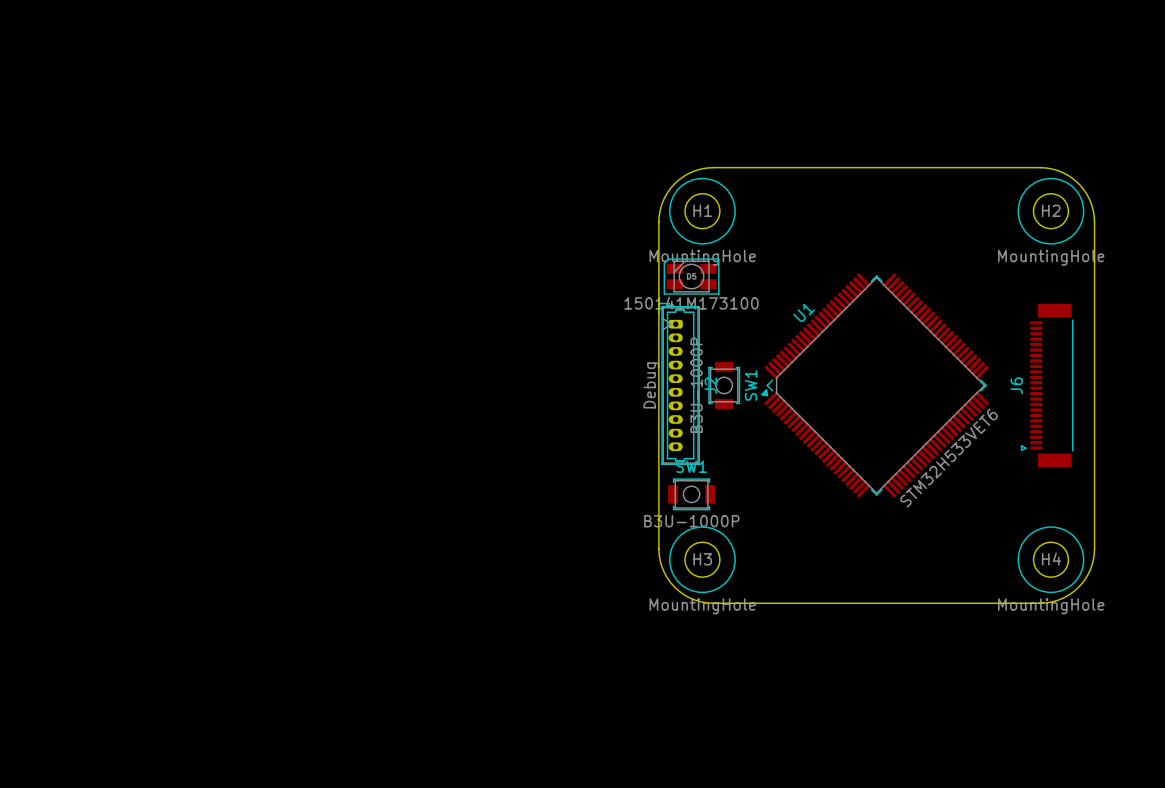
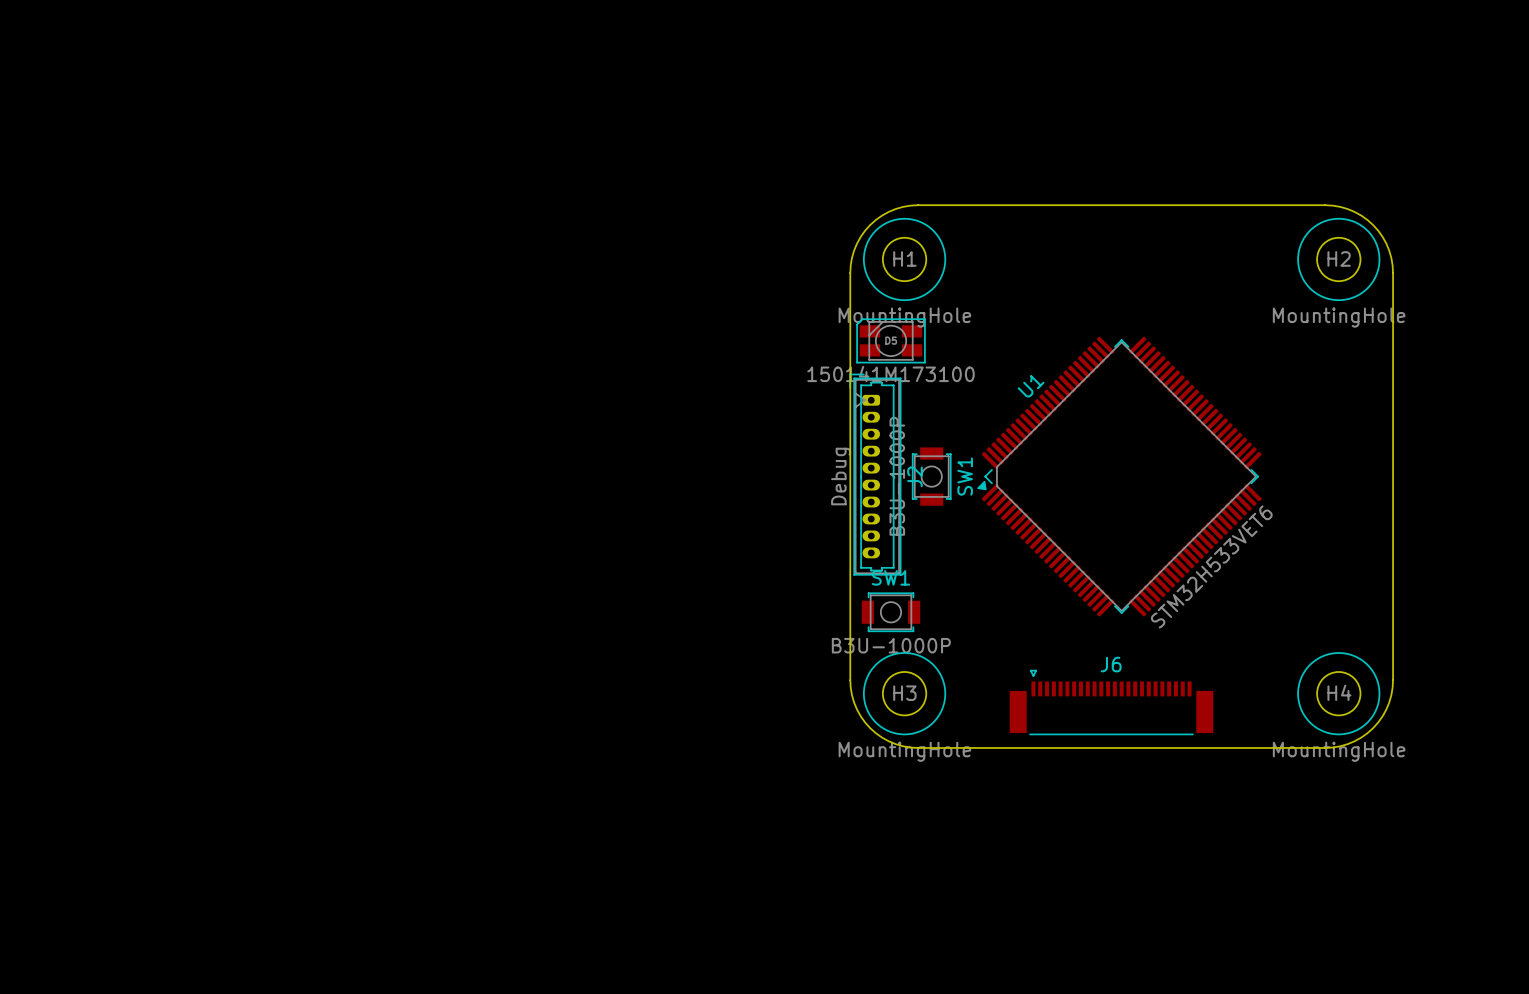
J6 rotation: 0° (1047, 385) -> 90° clockwise (1111, 702)
J6 position: (1047, 385) -> (1111, 702)

